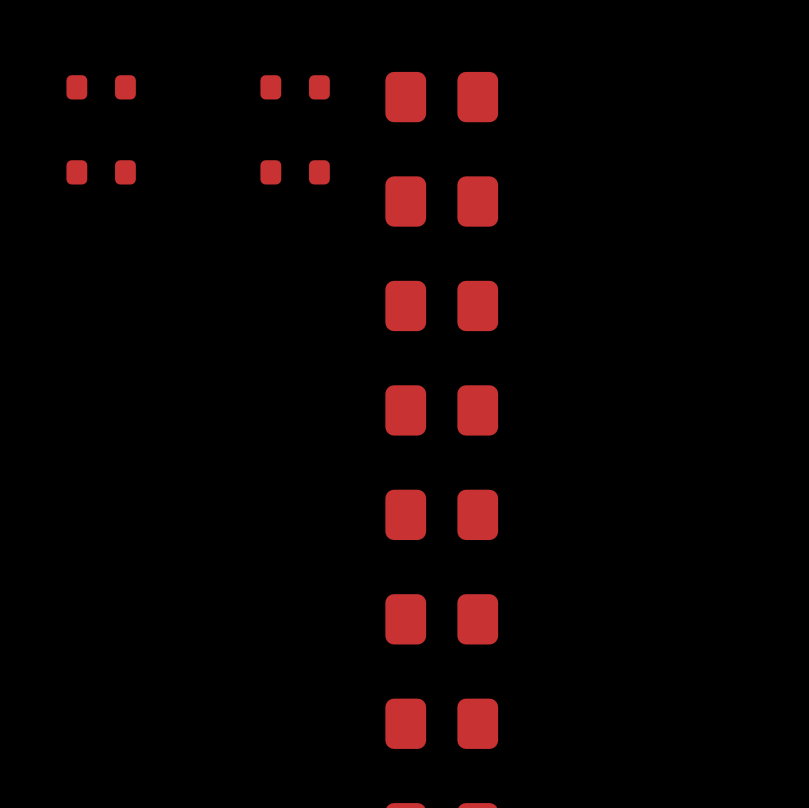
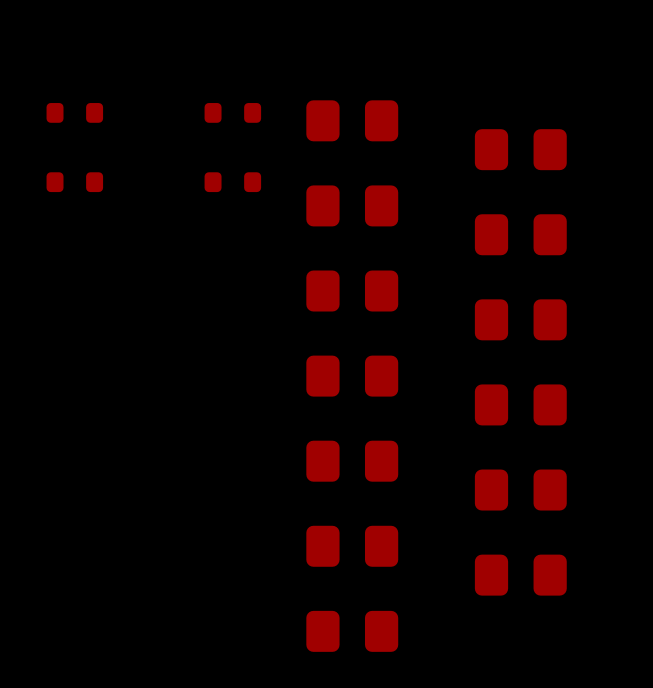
part: none -> (520, 149)
part: none -> (520, 234)
part: none -> (520, 319)
part: none -> (520, 404)
part: none -> (520, 490)
part: none -> (520, 575)

